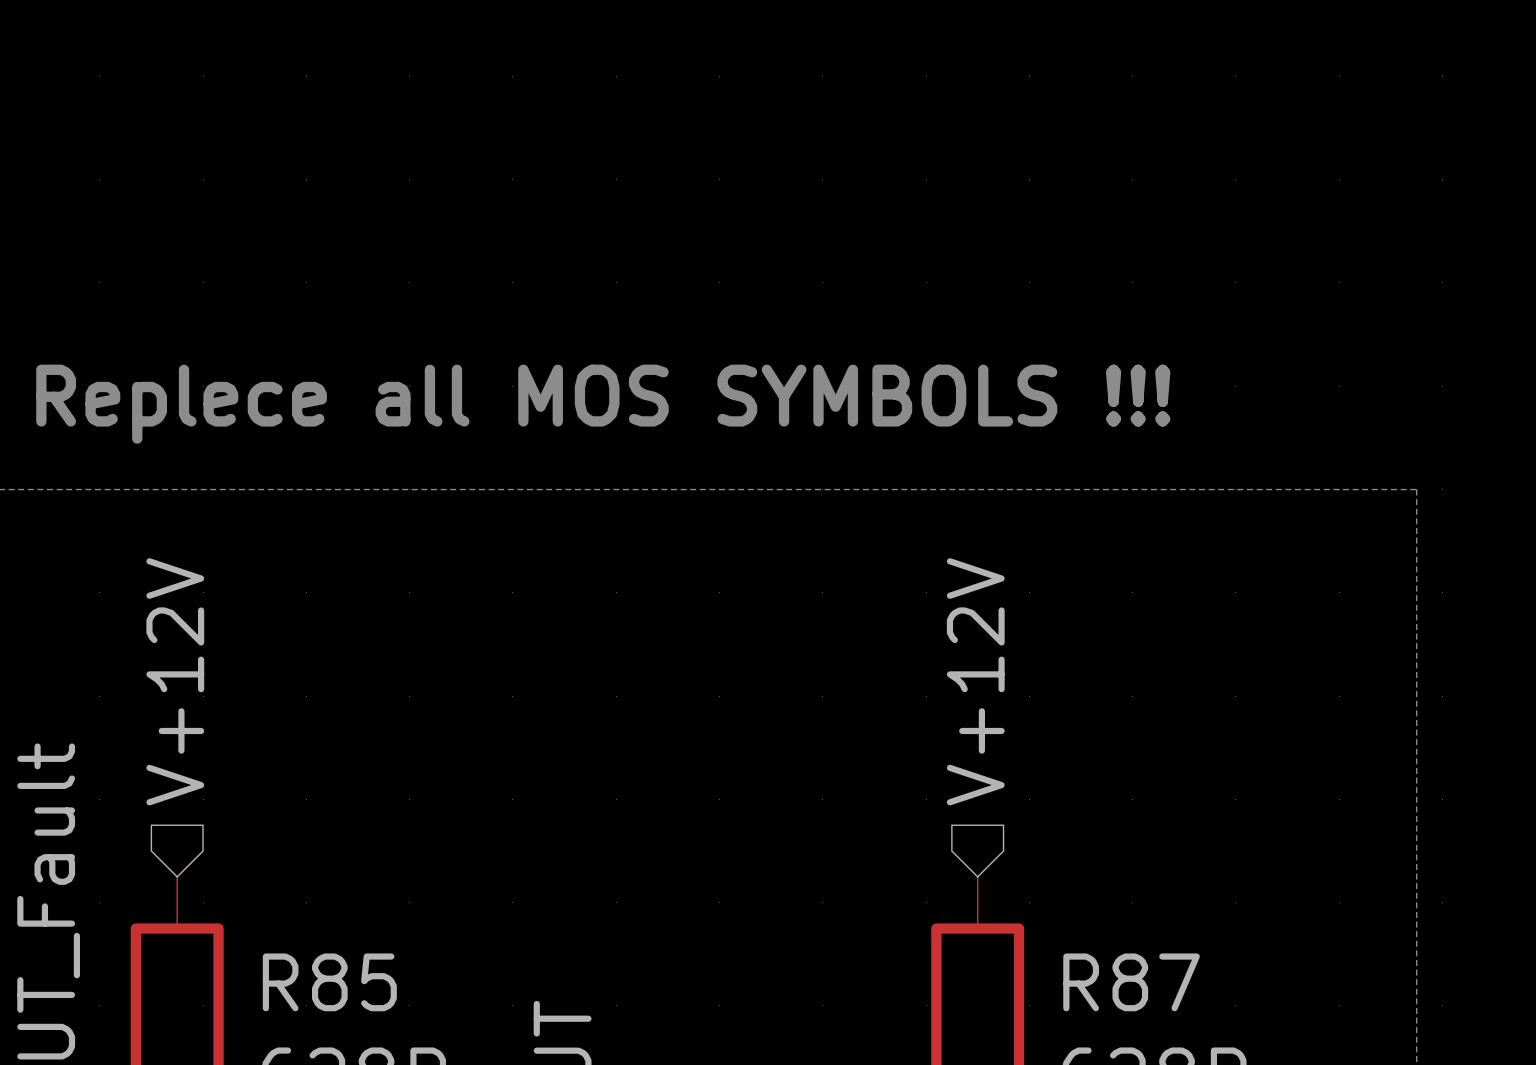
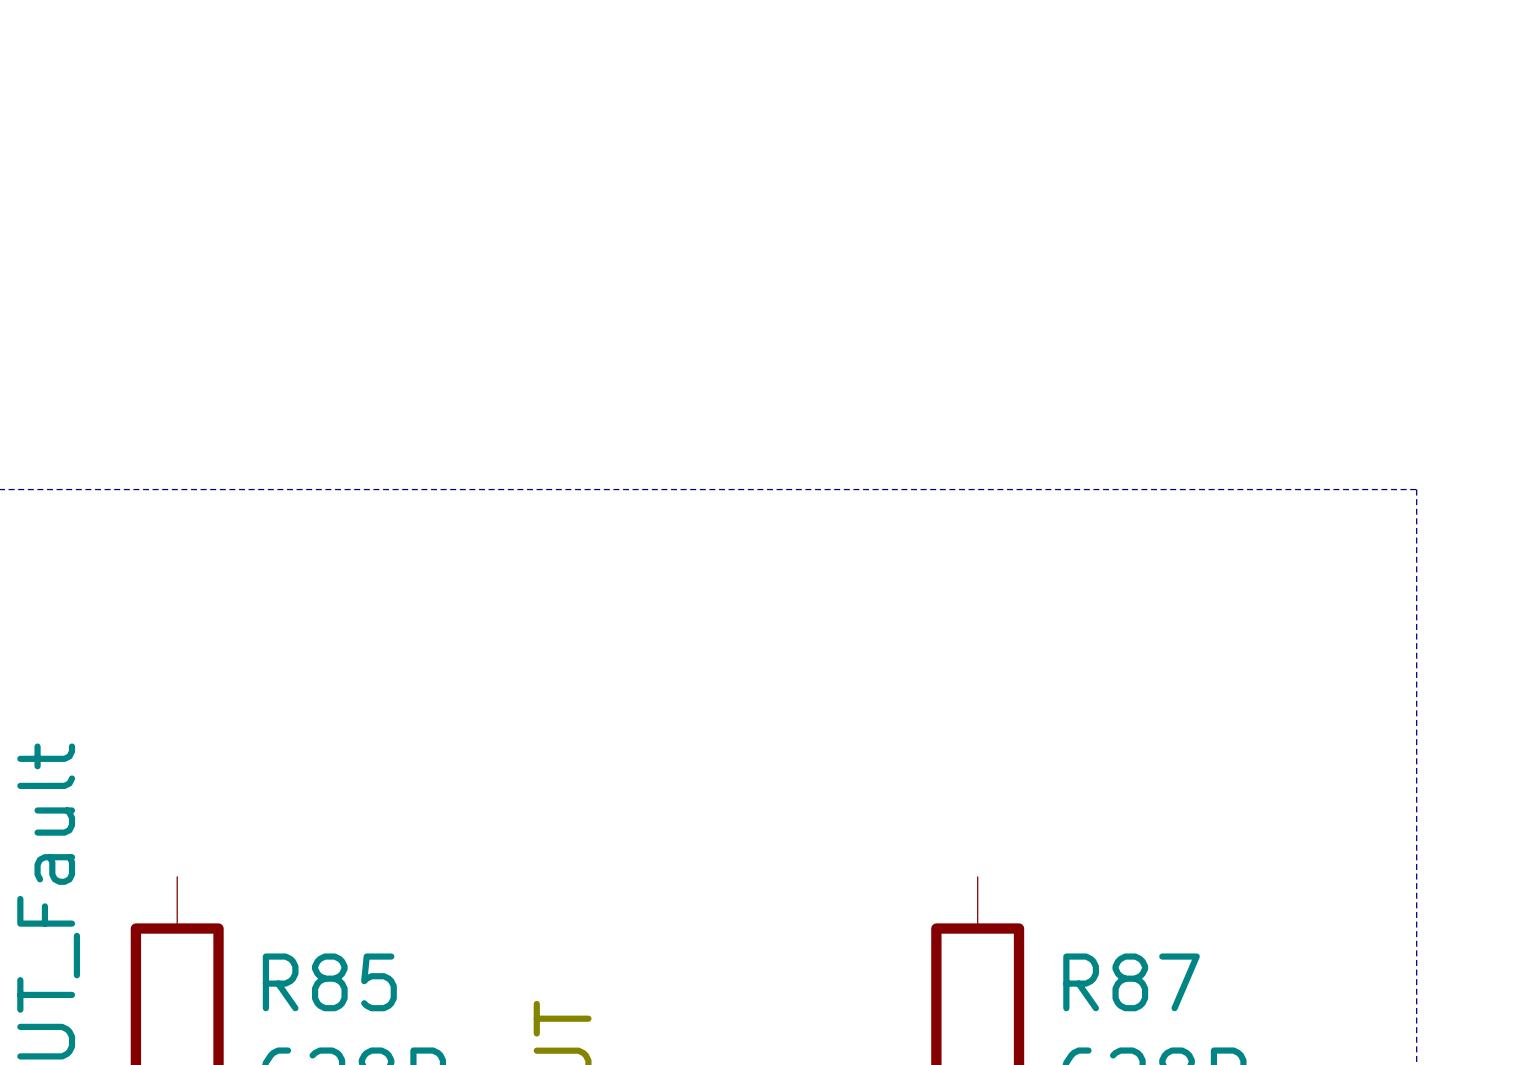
text: Replece all MOS SYMBOLS !!! (603, 404) -> none
hierarchical label: V+12V (175, 681) -> none
hierarchical label: V+12V (975, 681) -> none

